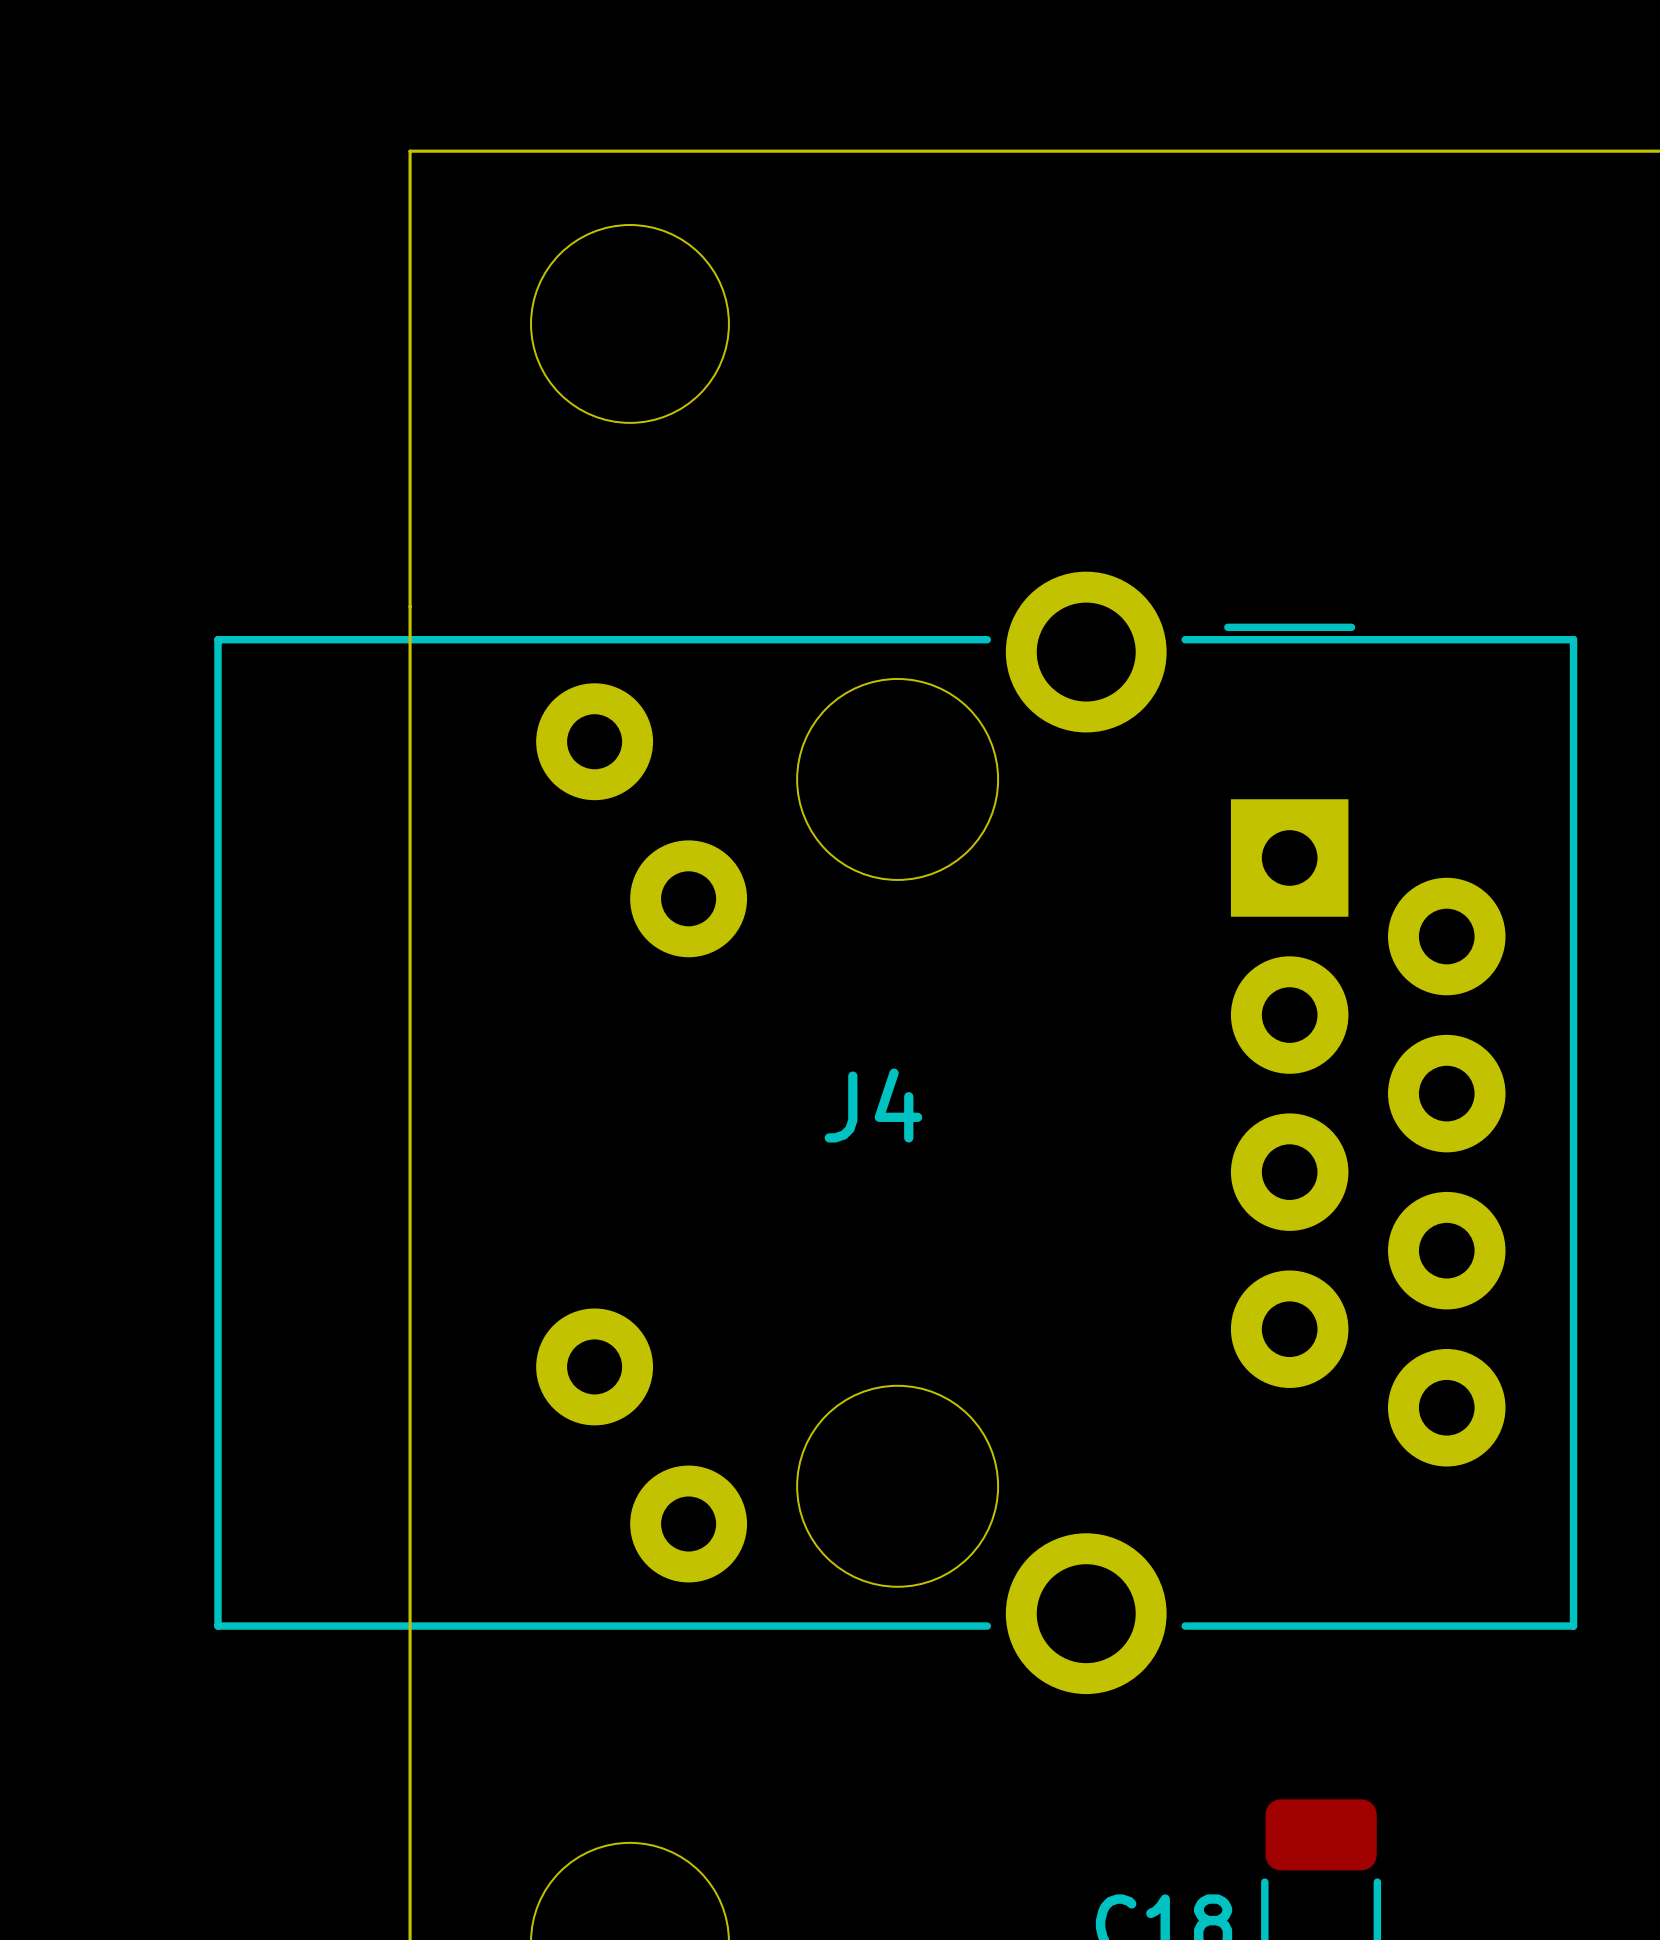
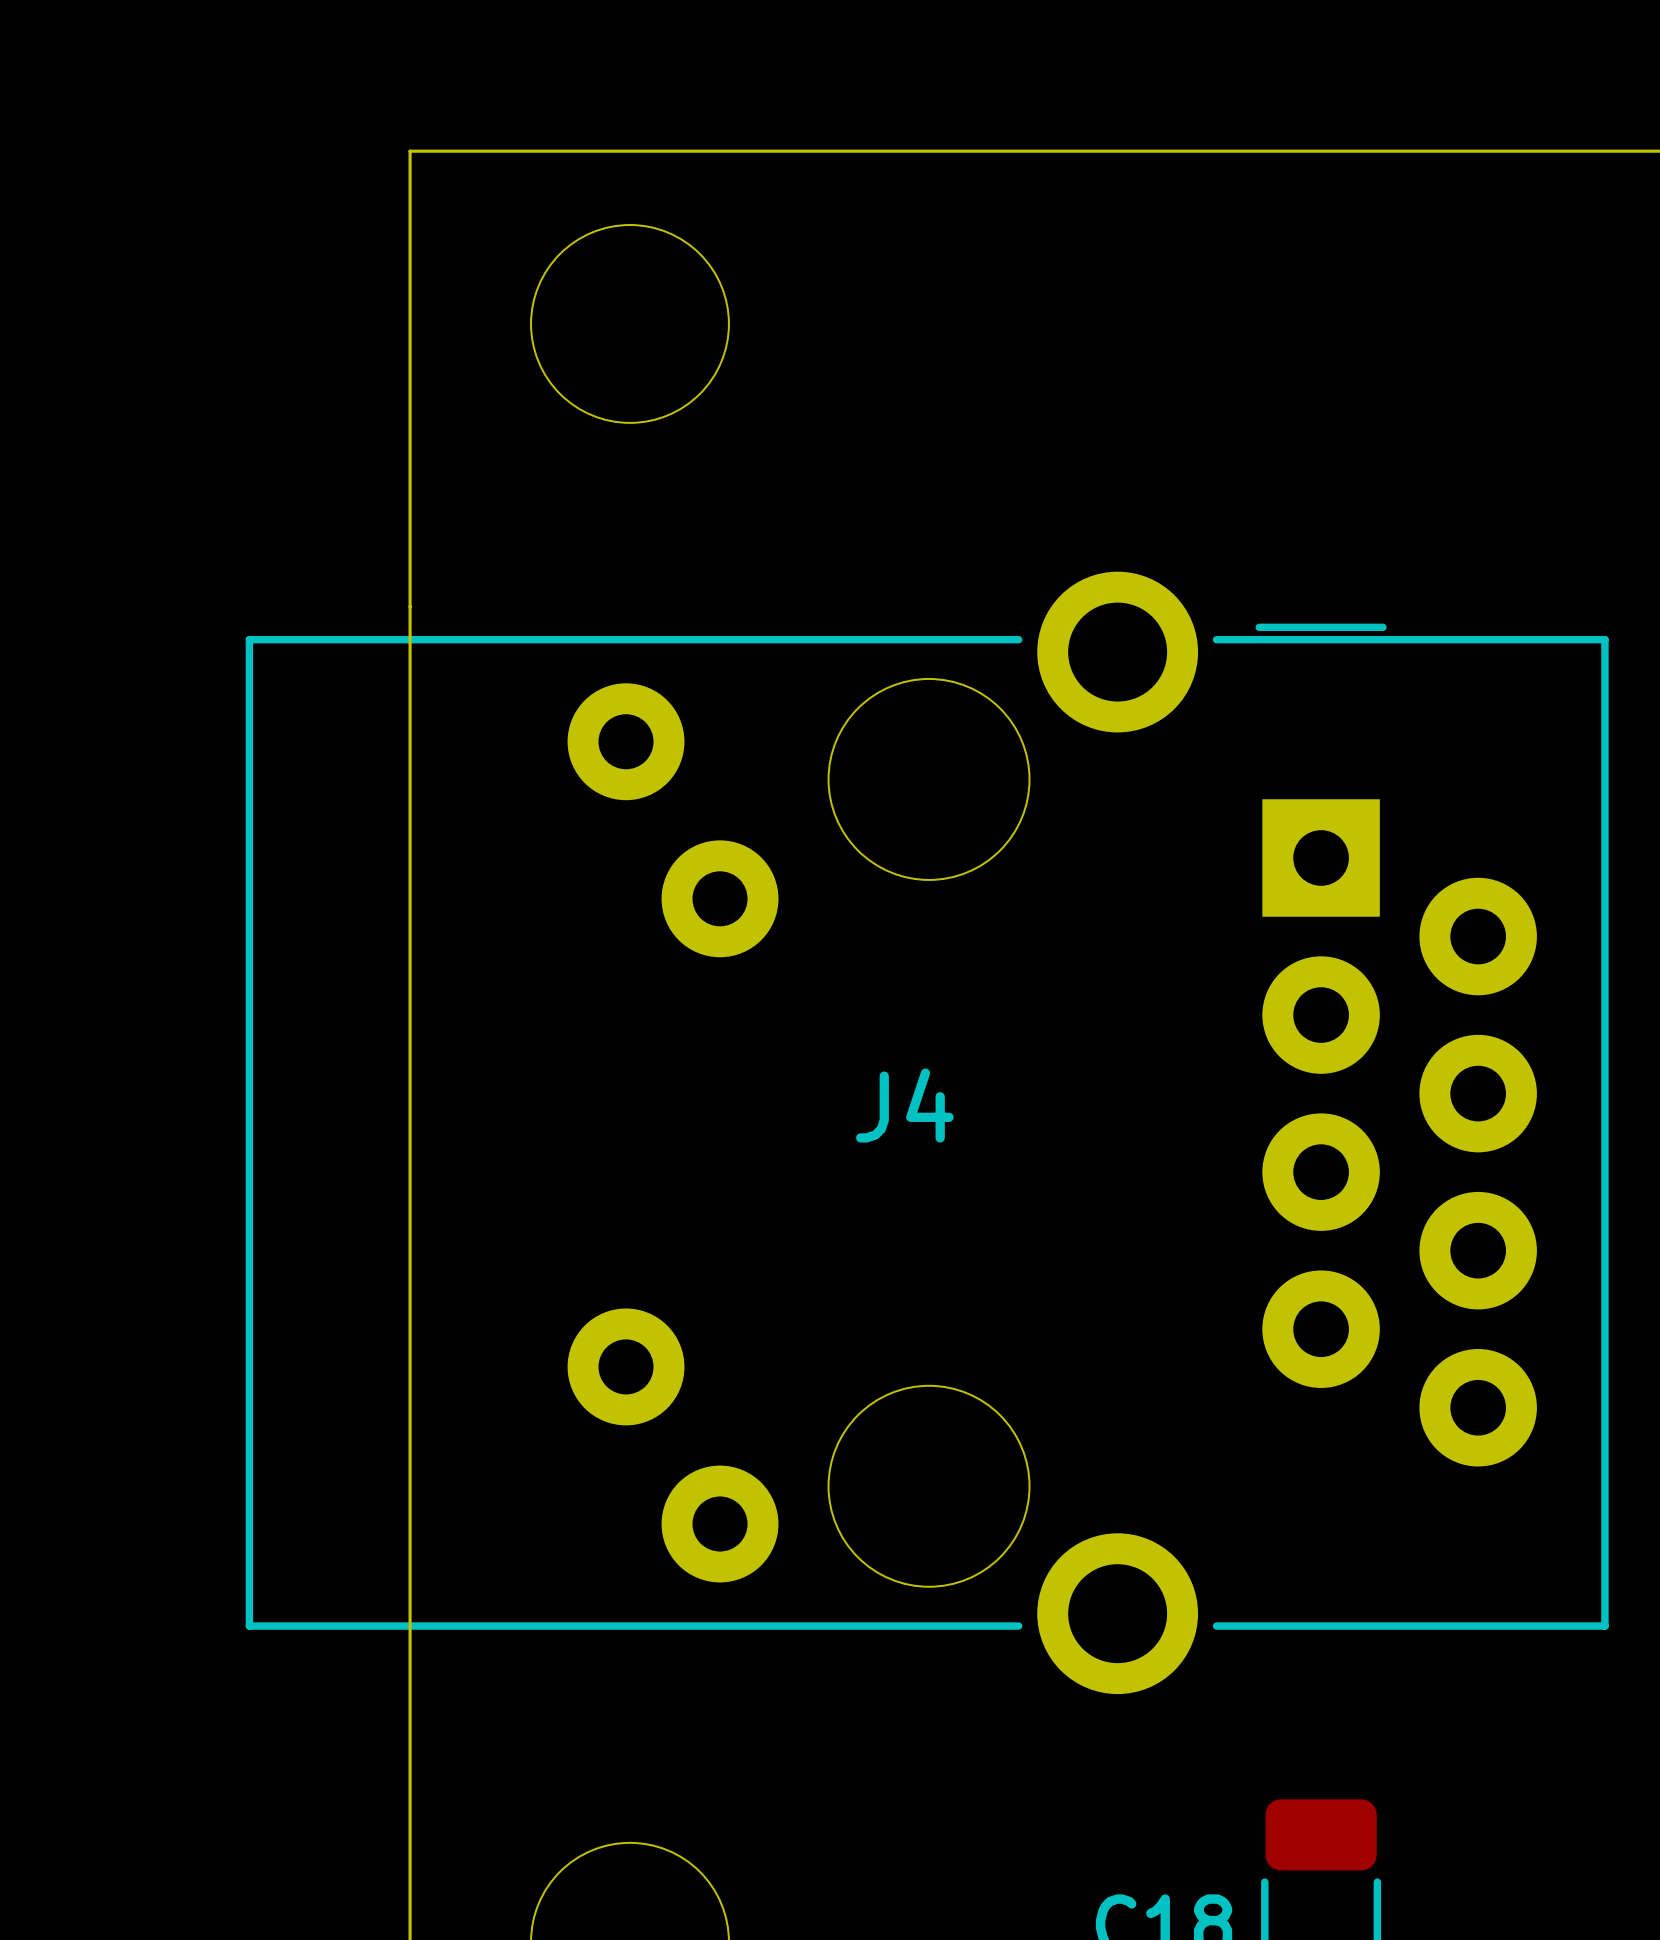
J4 position: (895, 1132) -> (927, 1132)

